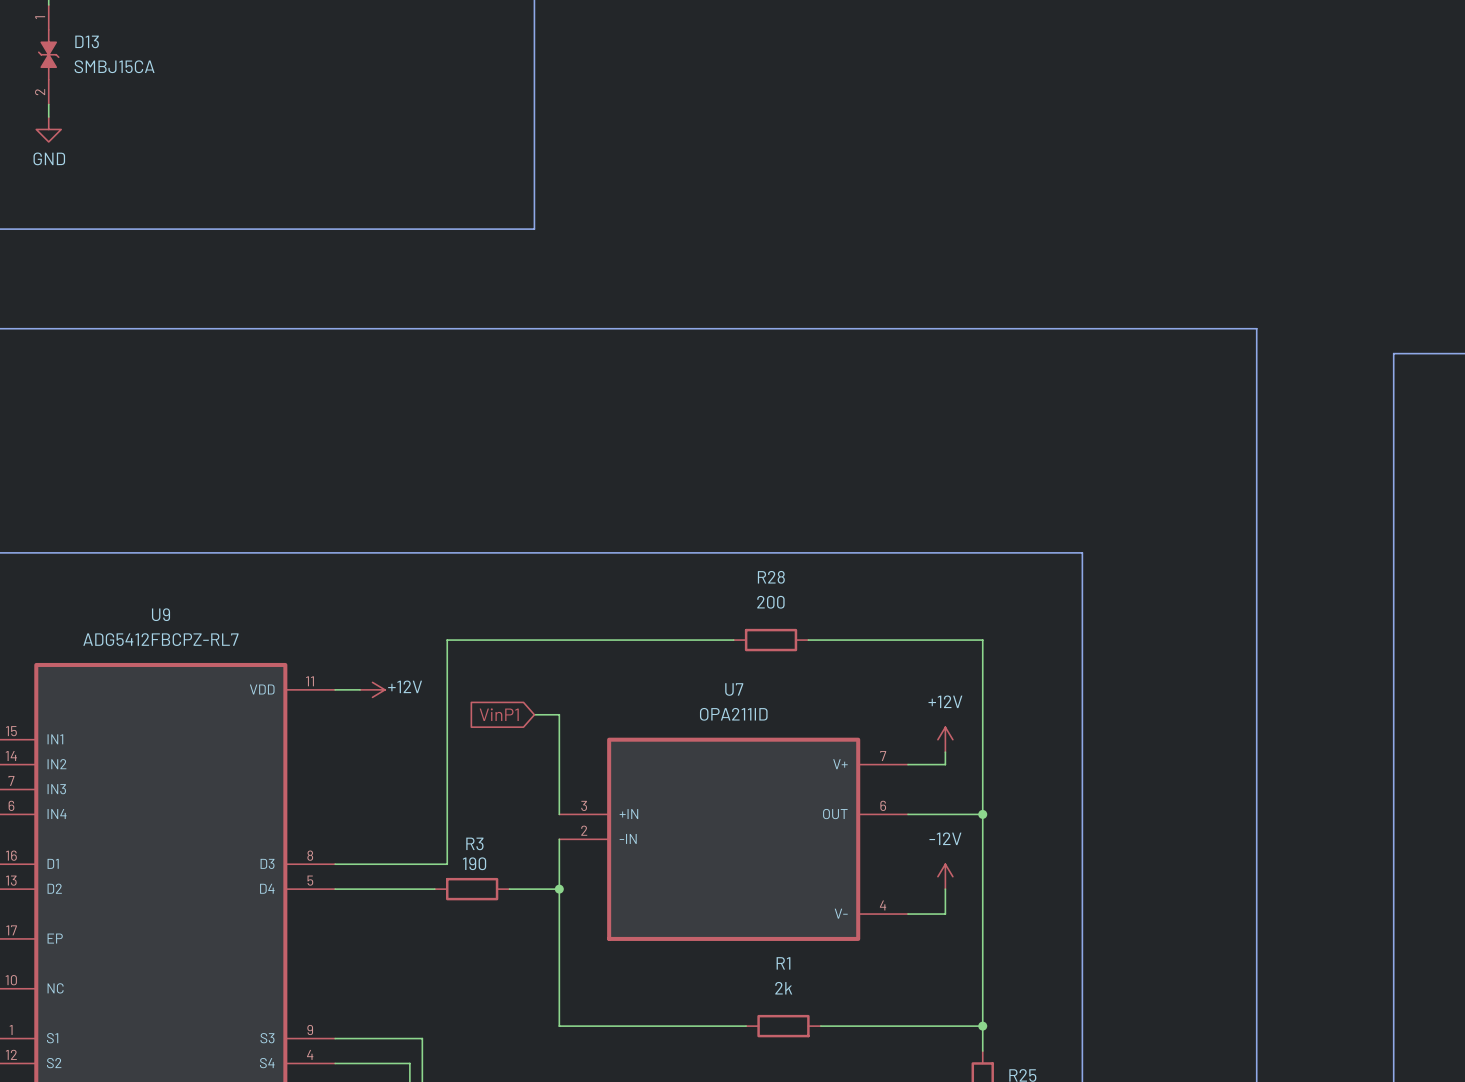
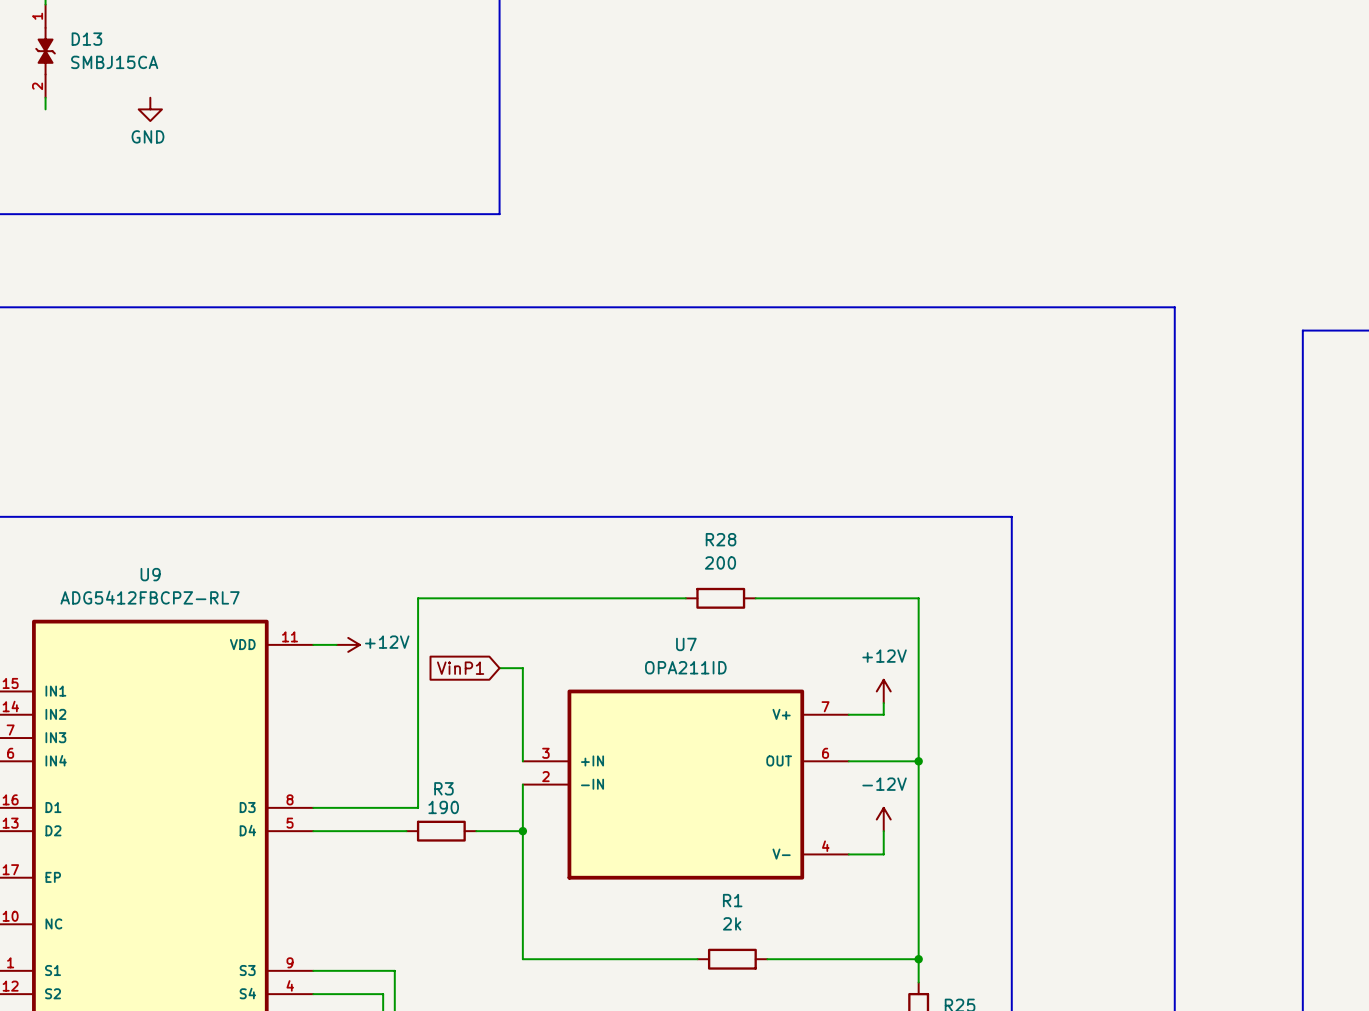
power symbol: none -> GND (150, 109)
power symbol: GND (48, 129) -> none

